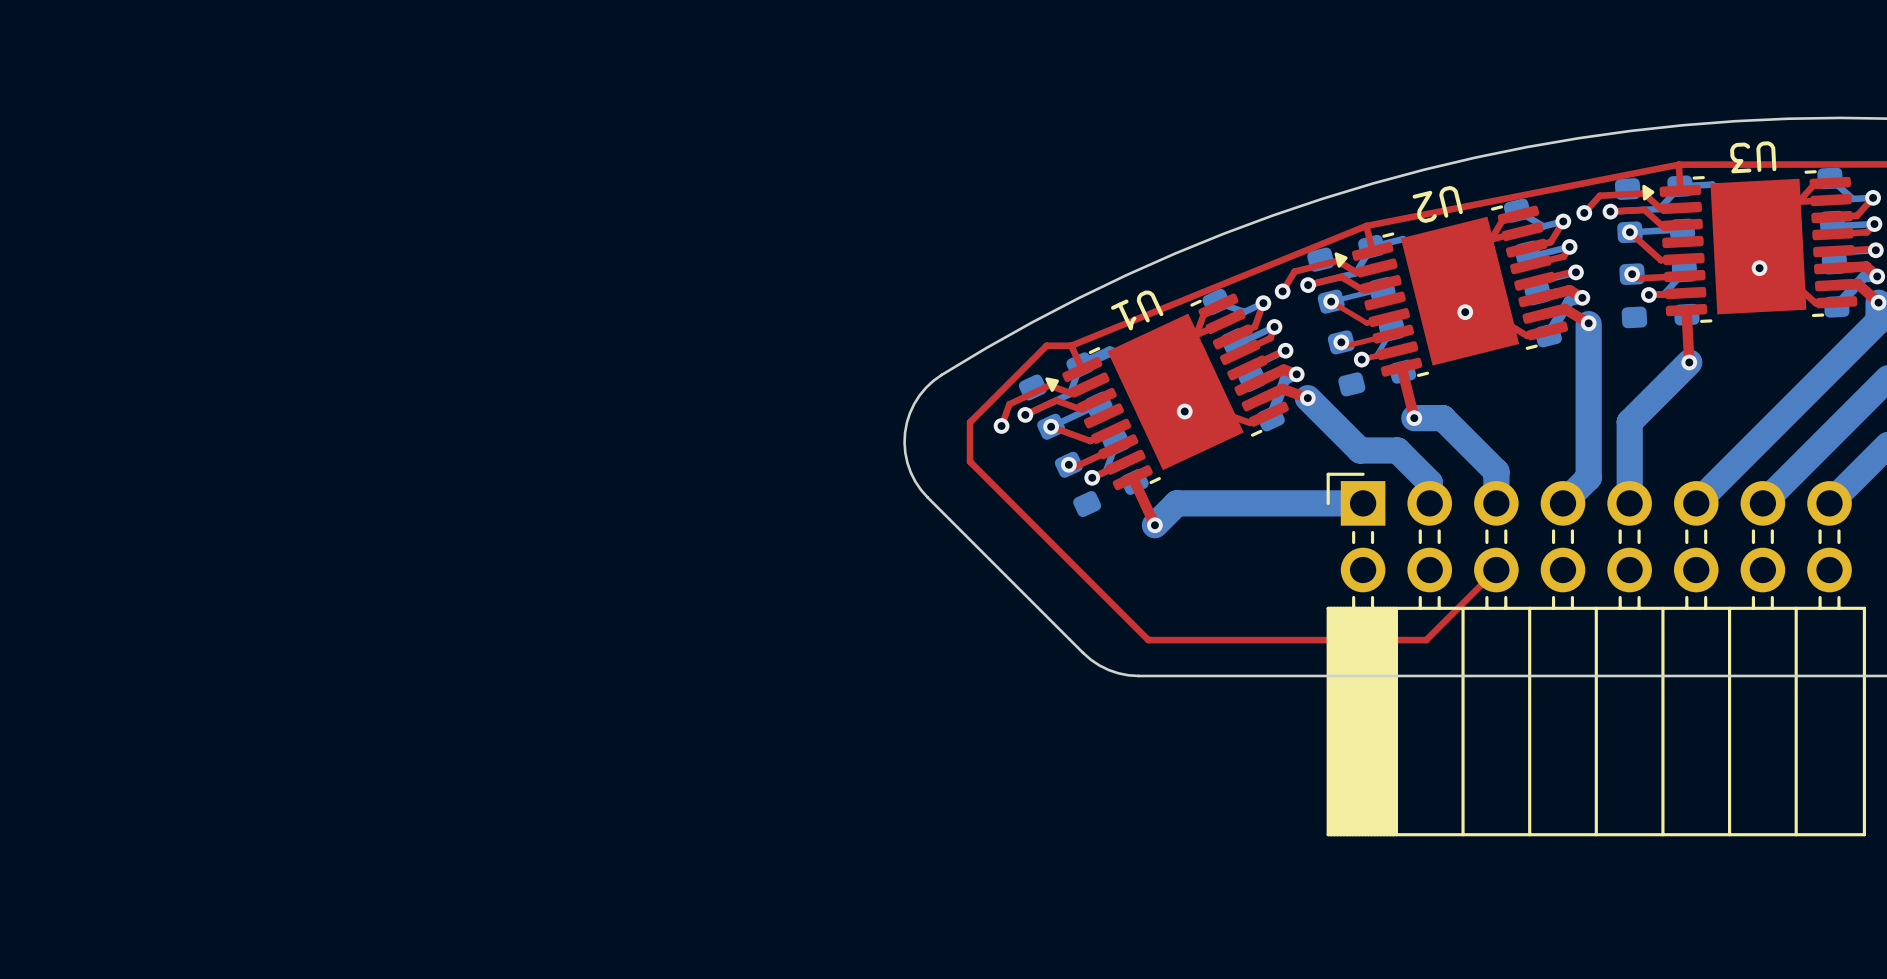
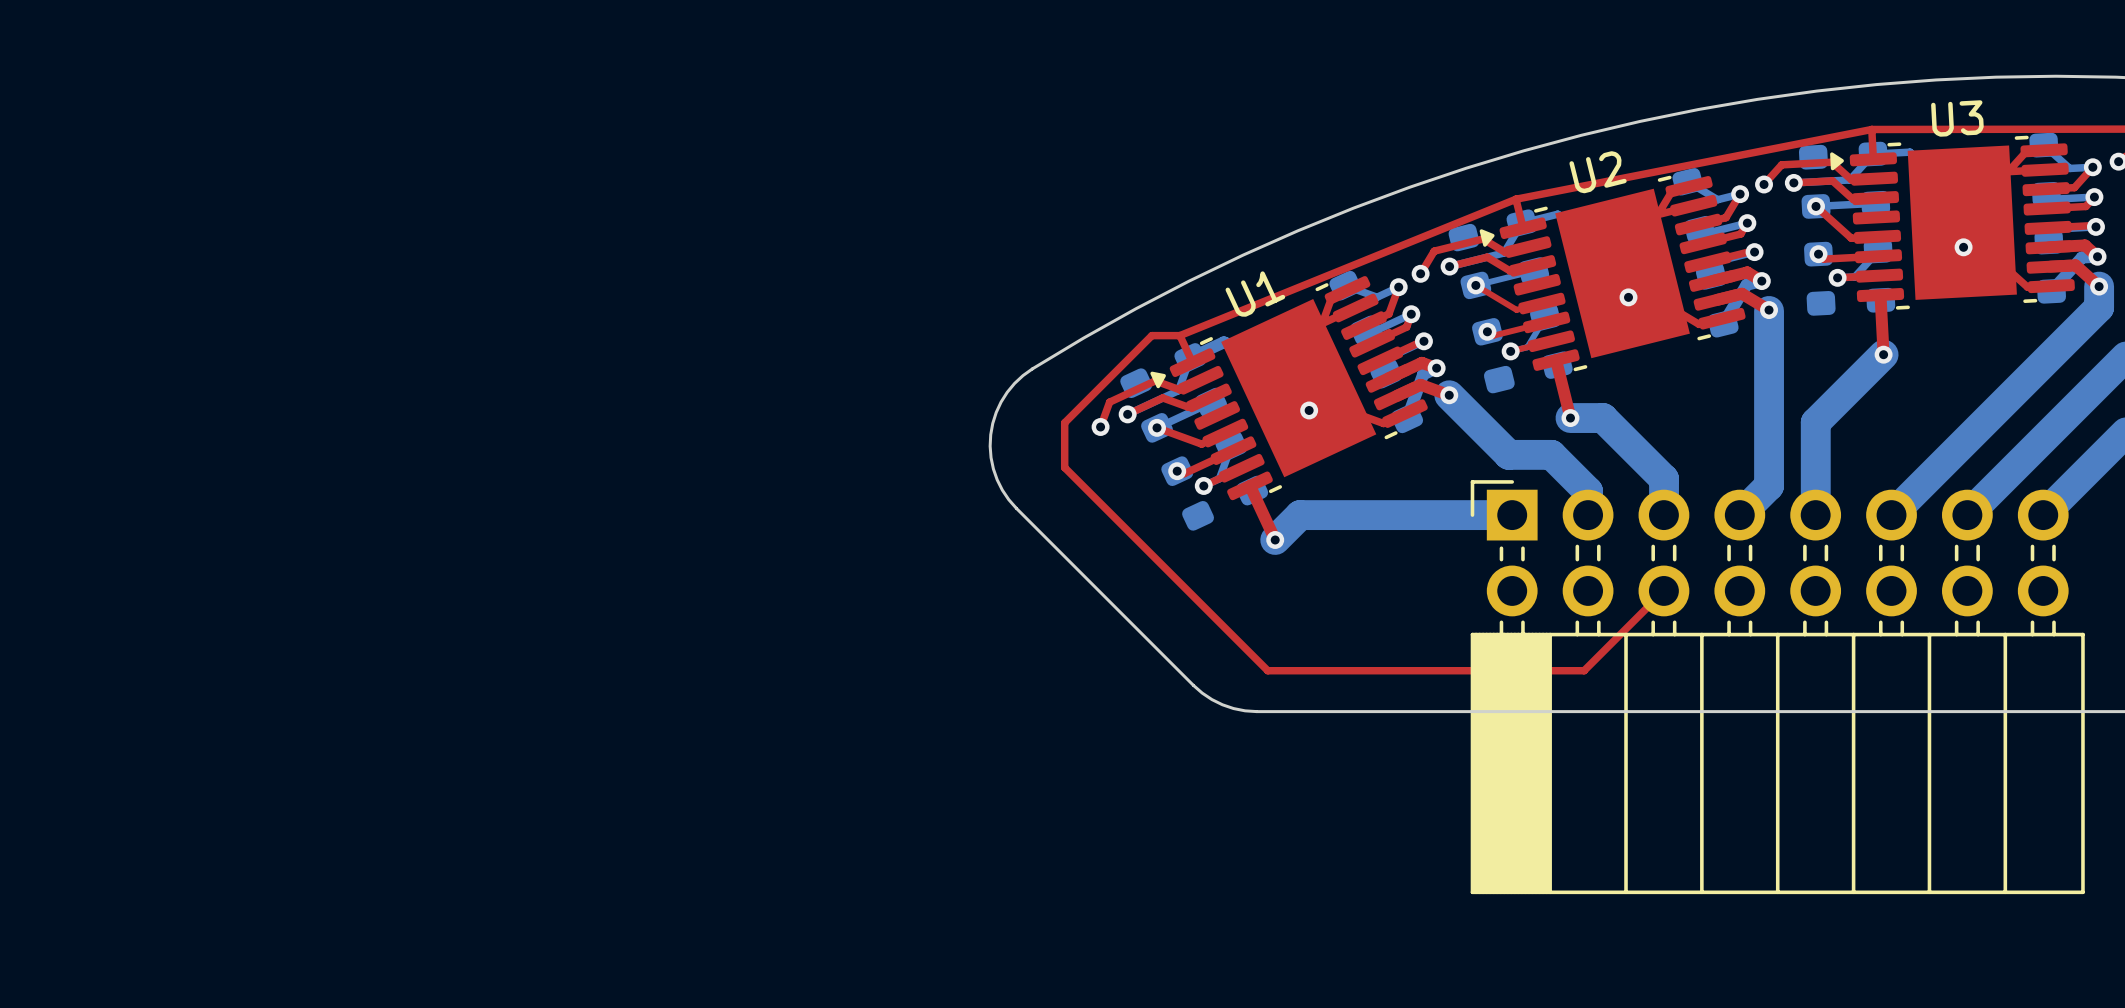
U3 name rotation: 0° (1753, 157) -> 180° (1957, 118)
U2 name rotation: 0° (1437, 204) -> 180° (1598, 172)
U1 name rotation: 0° (1137, 310) -> 180° (1255, 294)

